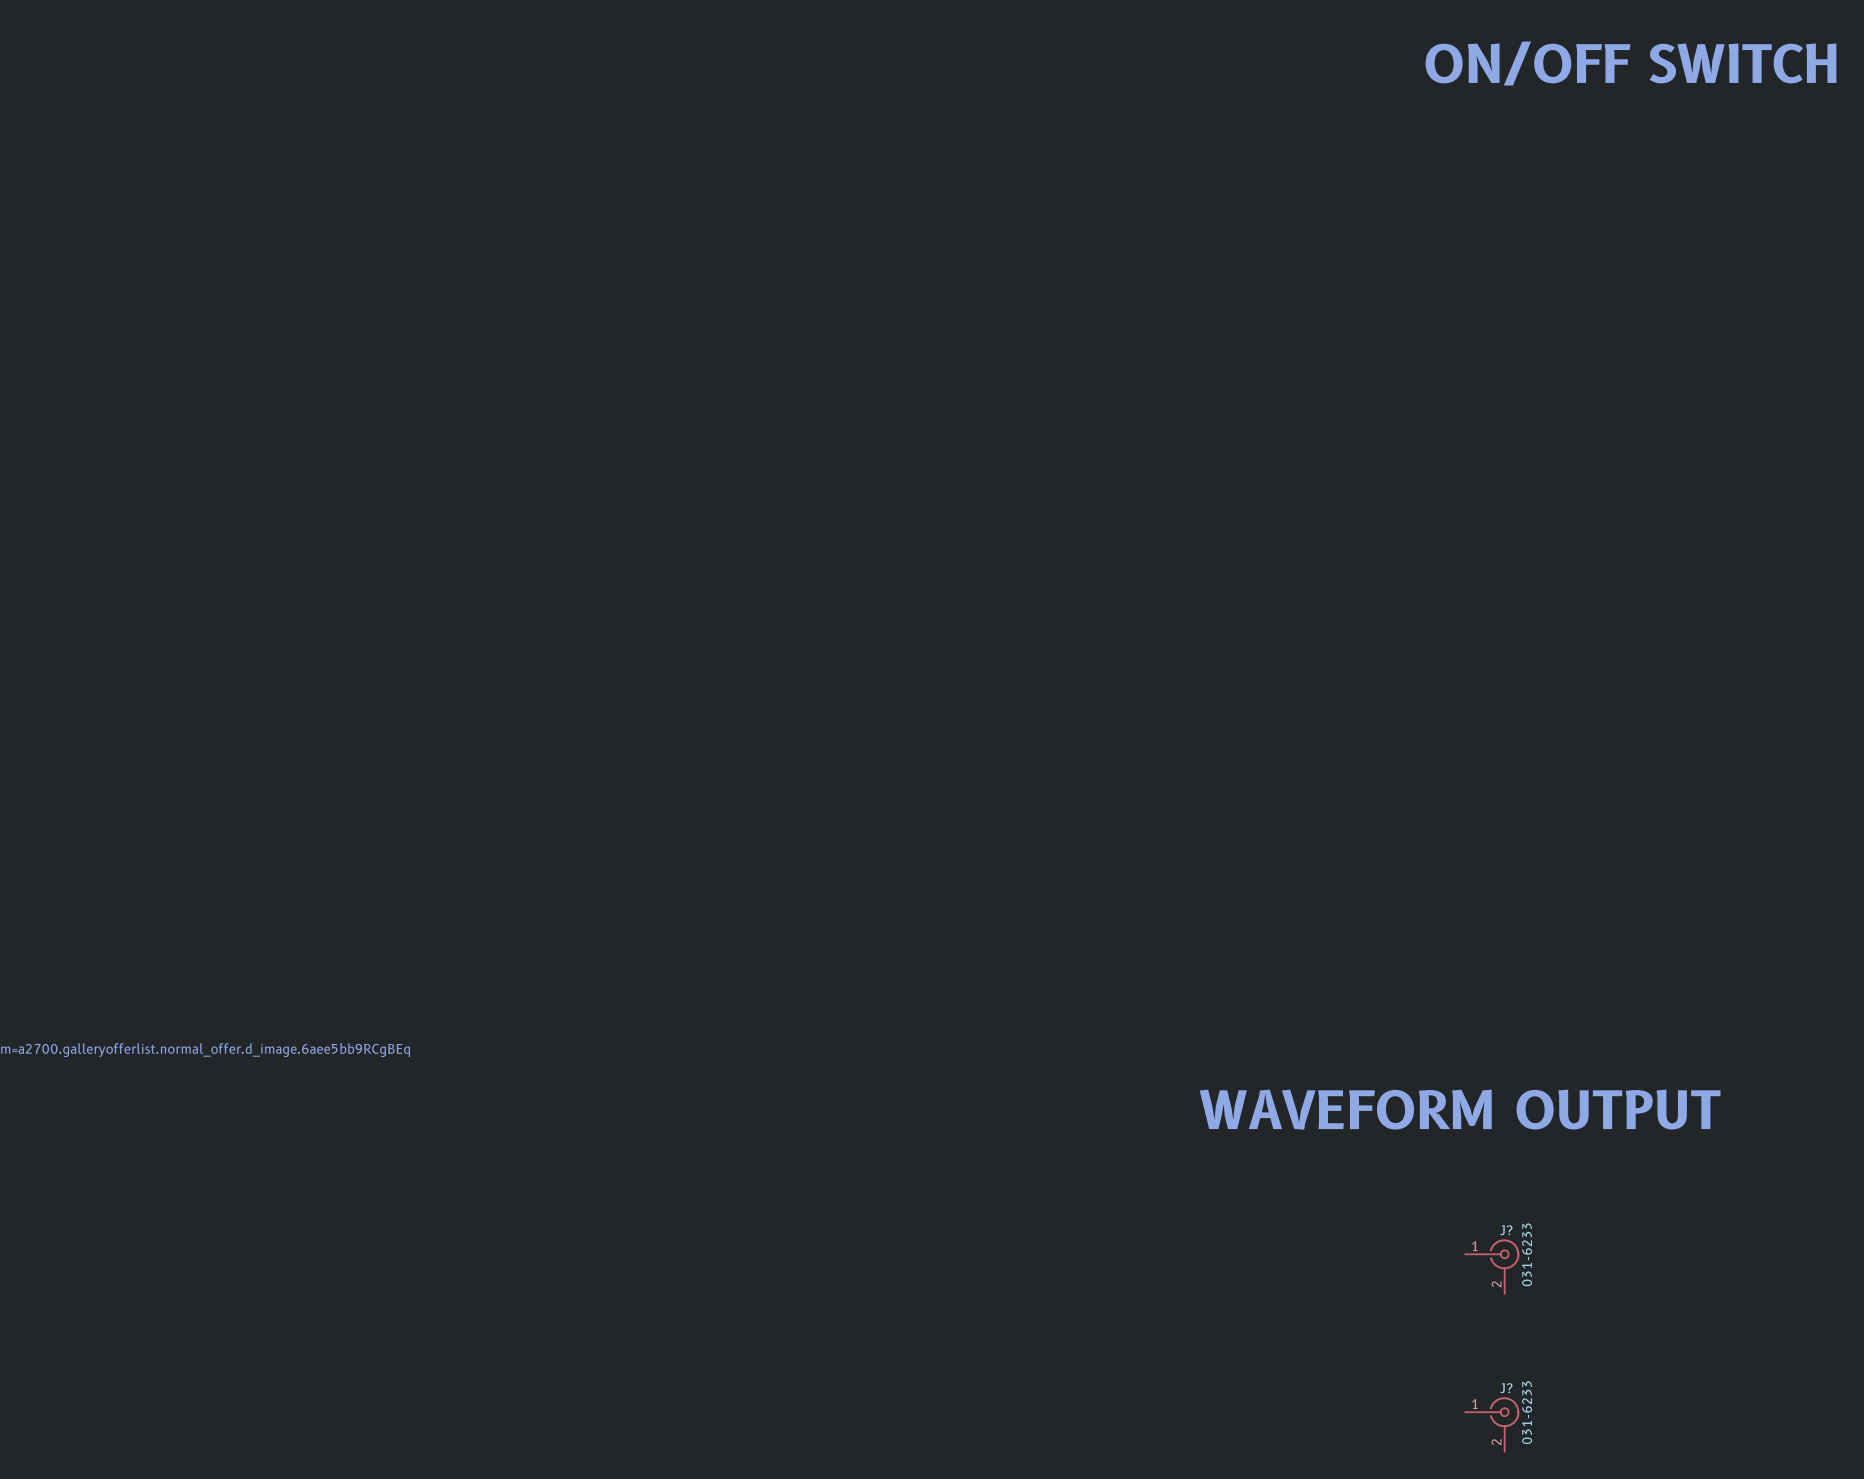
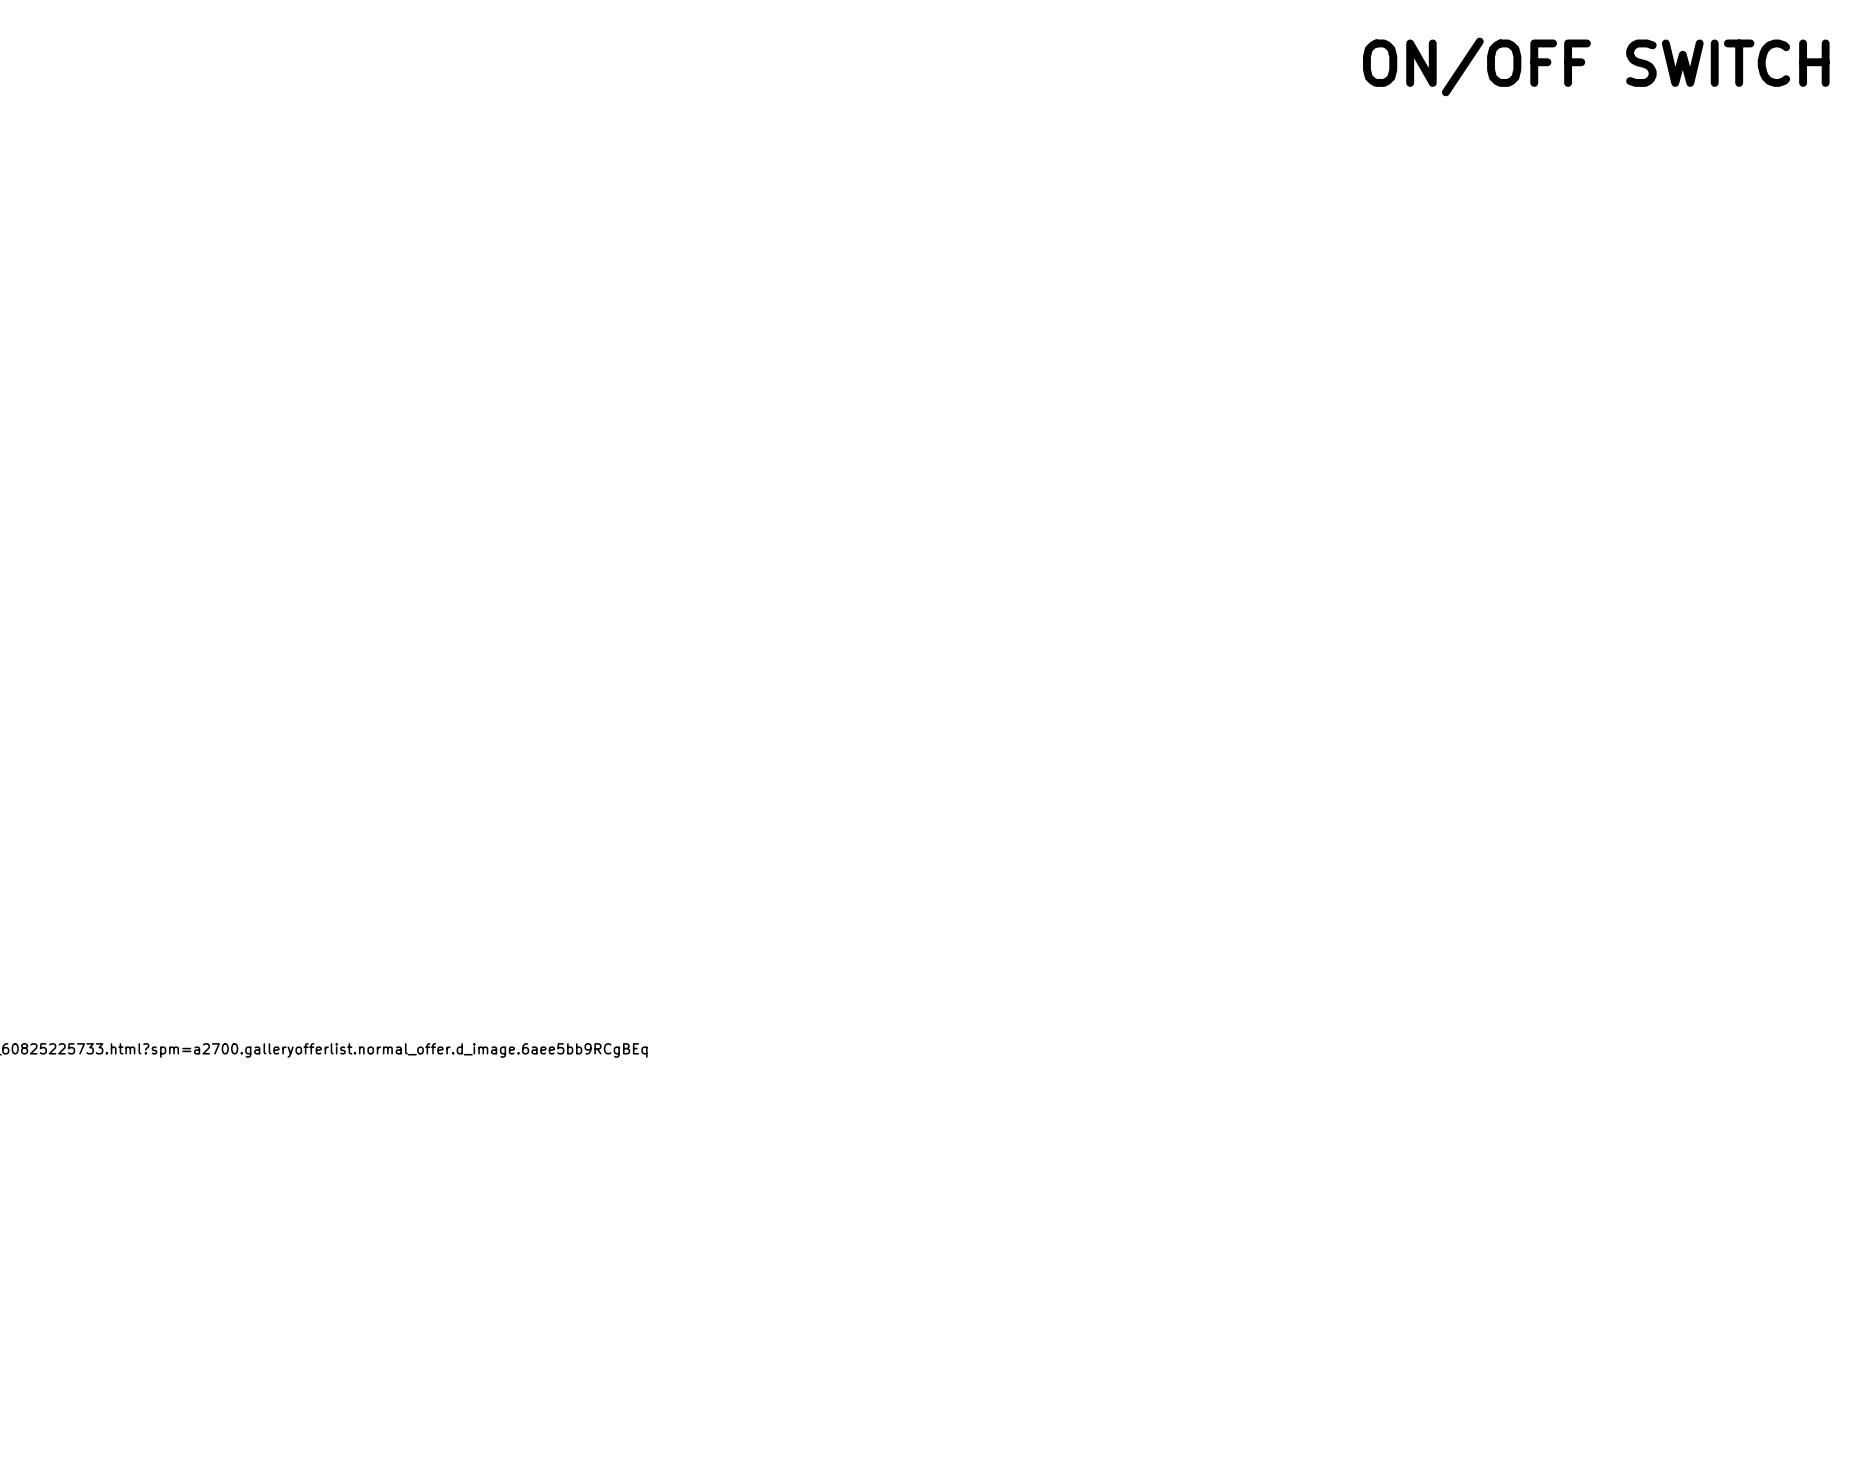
text: WAVEFORM OUTPUT (1460, 1109) -> none
J?: 031-6233 (1492, 1266) -> none
J?: 031-6233 (1492, 1424) -> none

